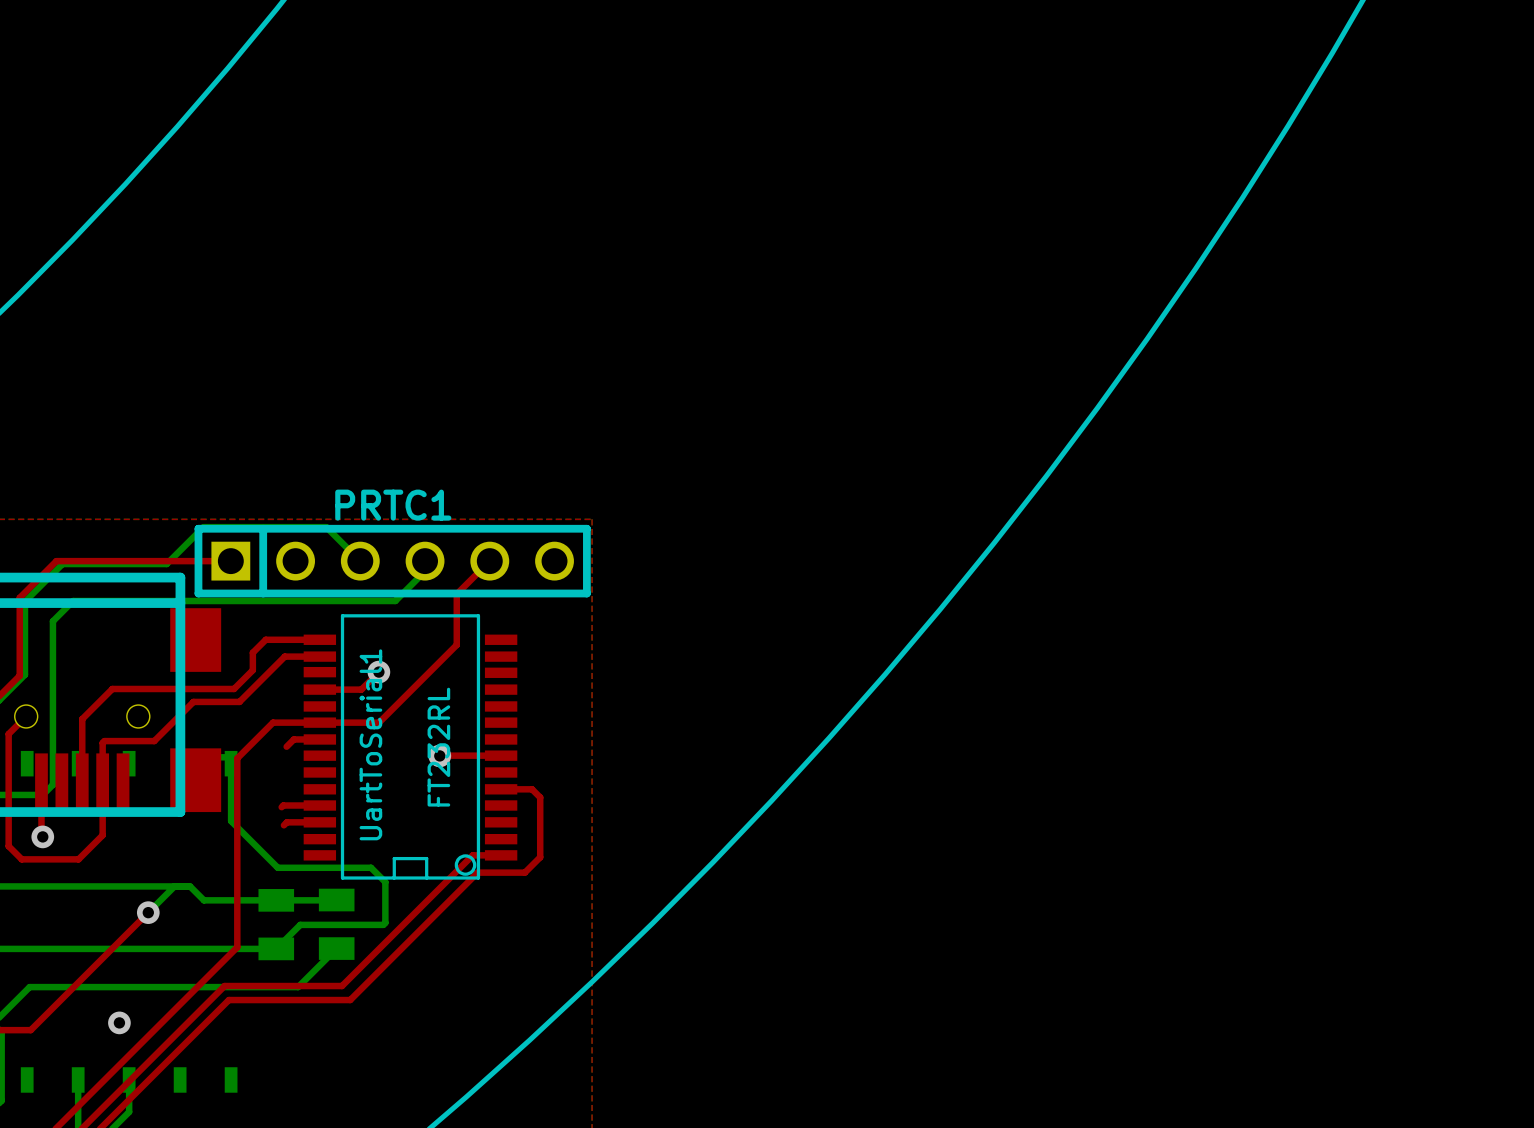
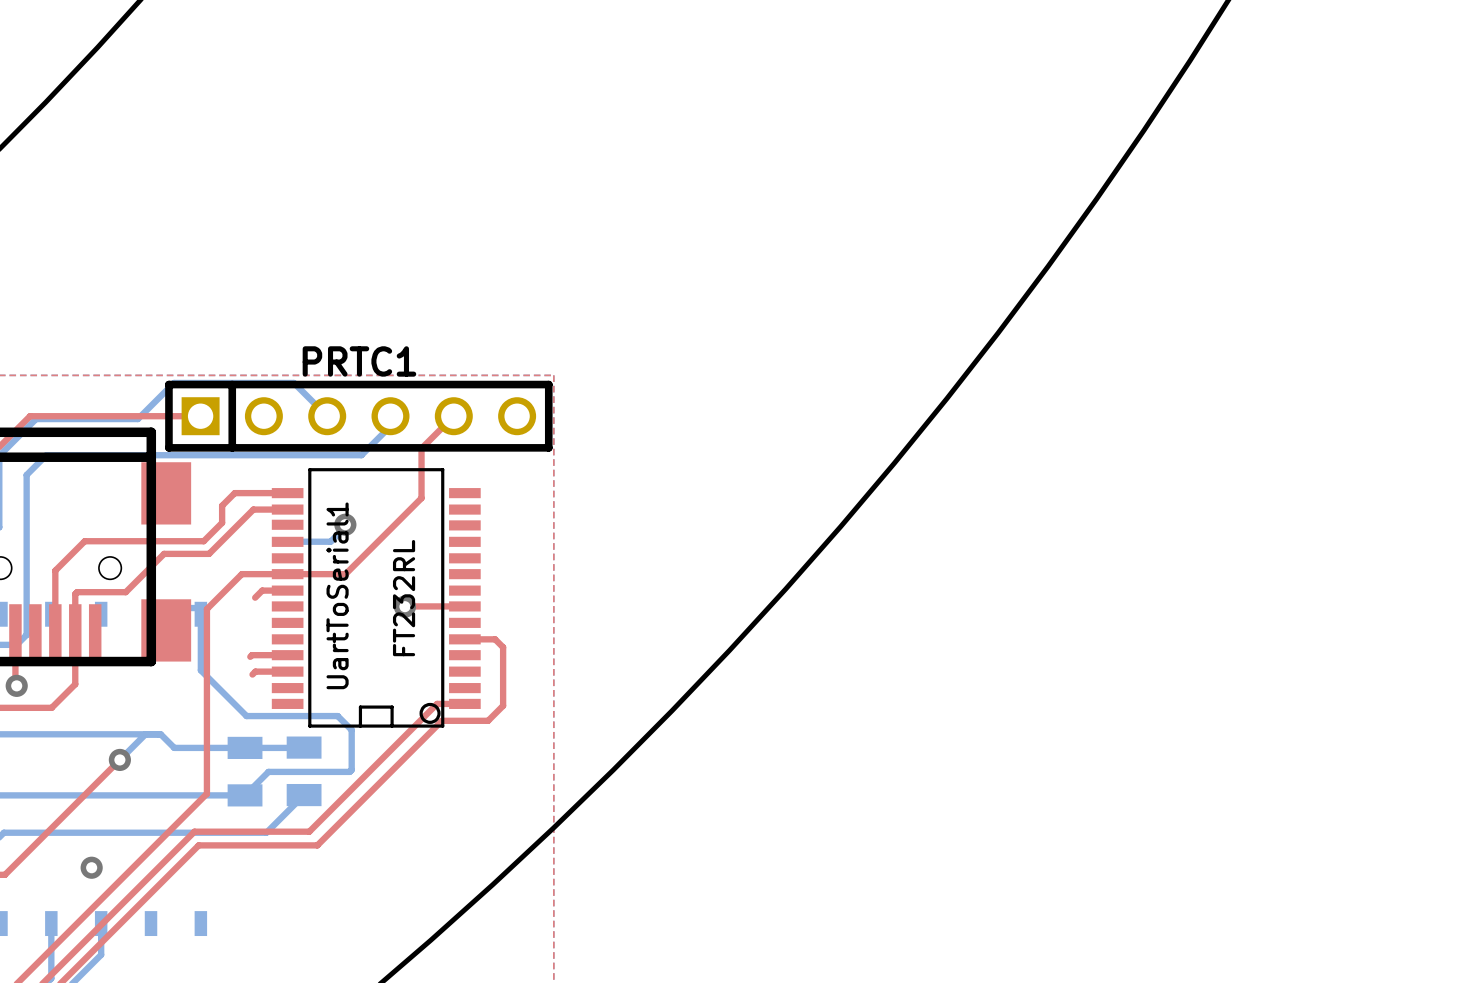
bottom track: none -> (349, 522) (330, 541) (294, 541)
top track: (378, 672) (361, 689) (319, 689) -> none

